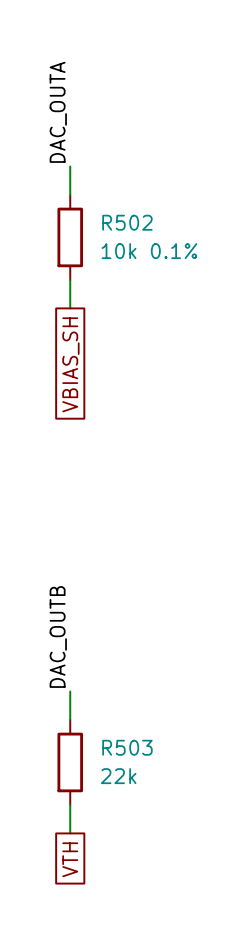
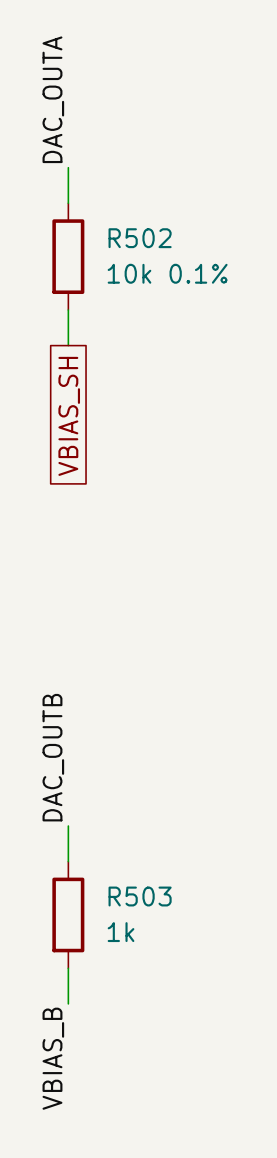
R503 value: 22k (118, 776) -> 1k (121, 932)
global label: VTH (70, 859) -> none
label: none -> VBIAS_B (53, 1058)

